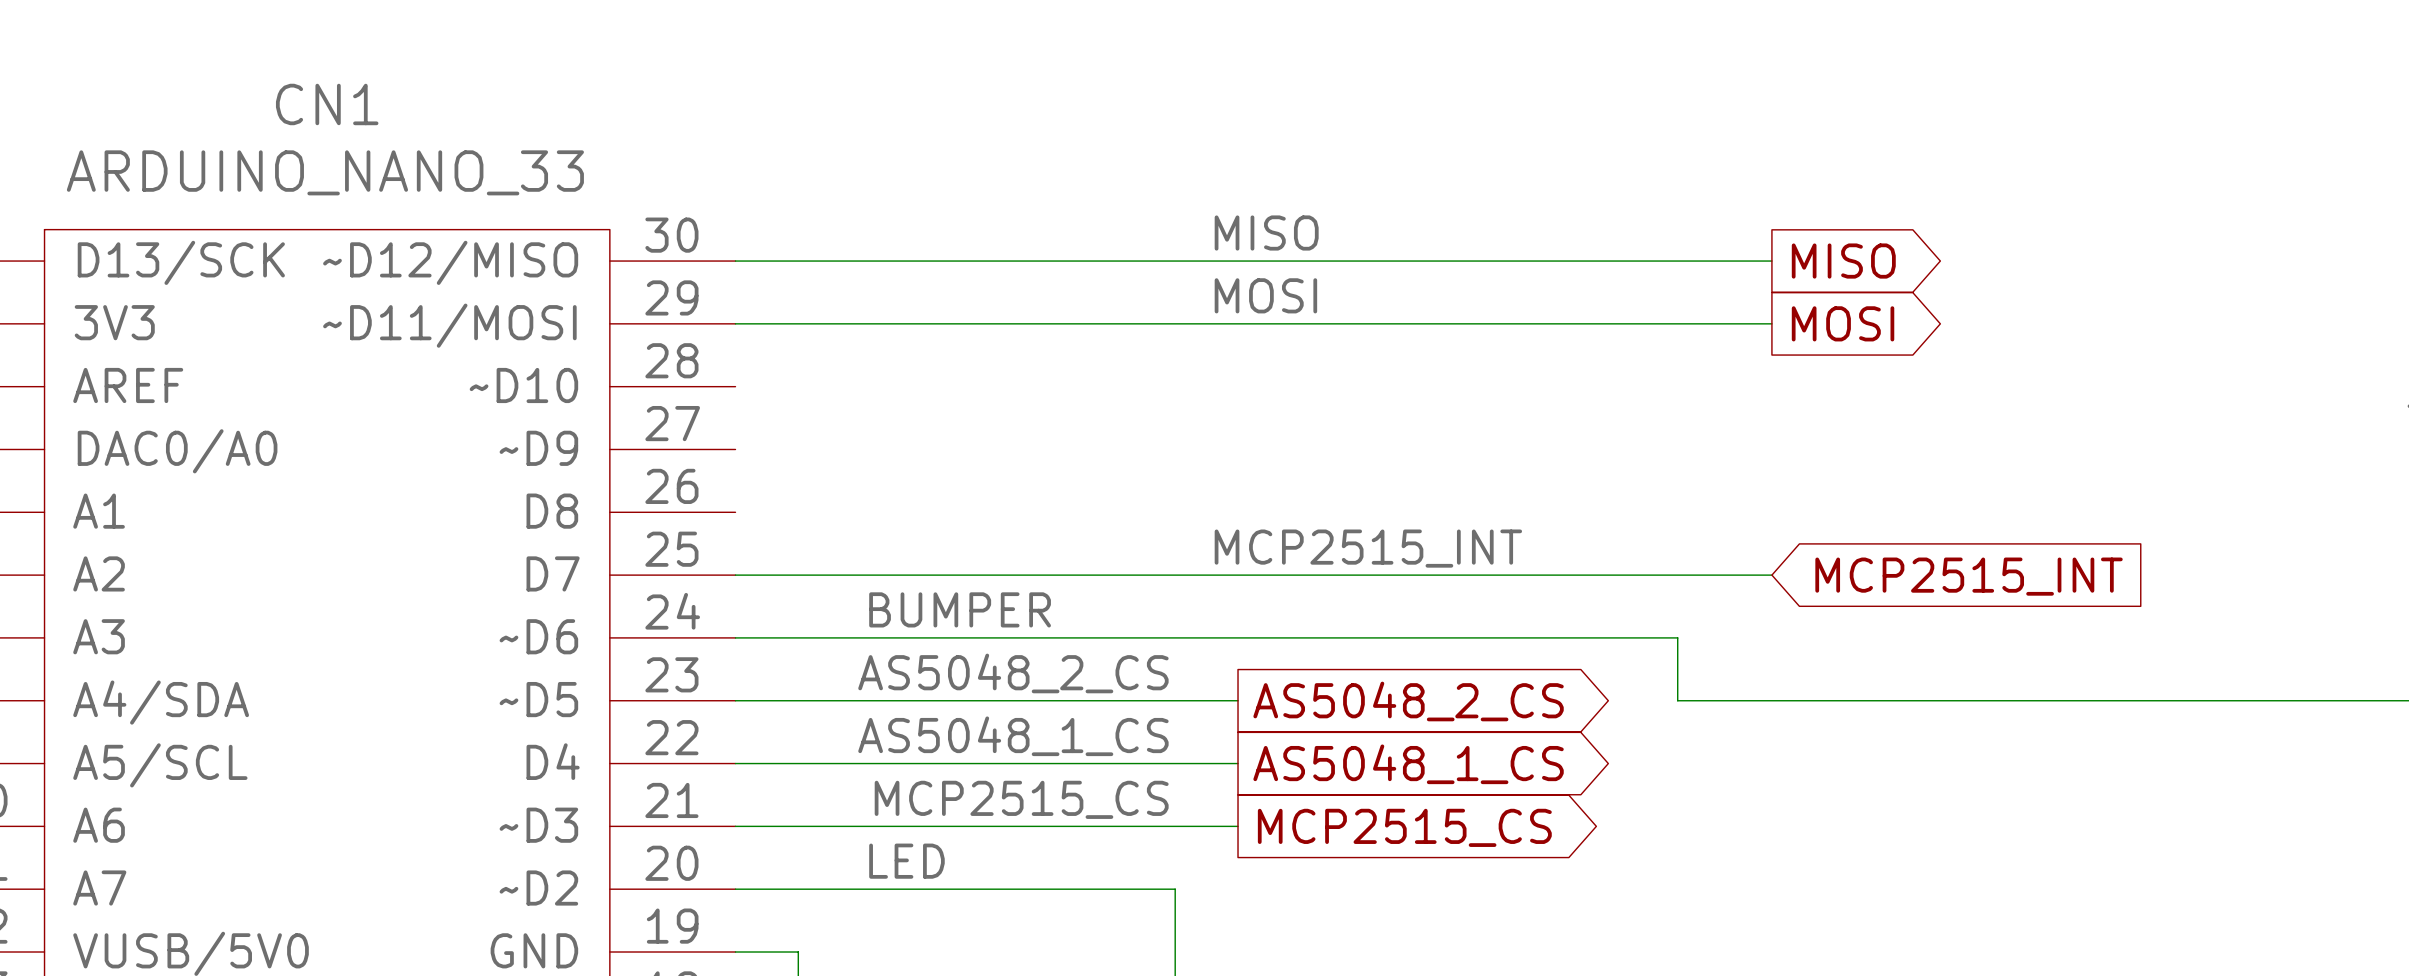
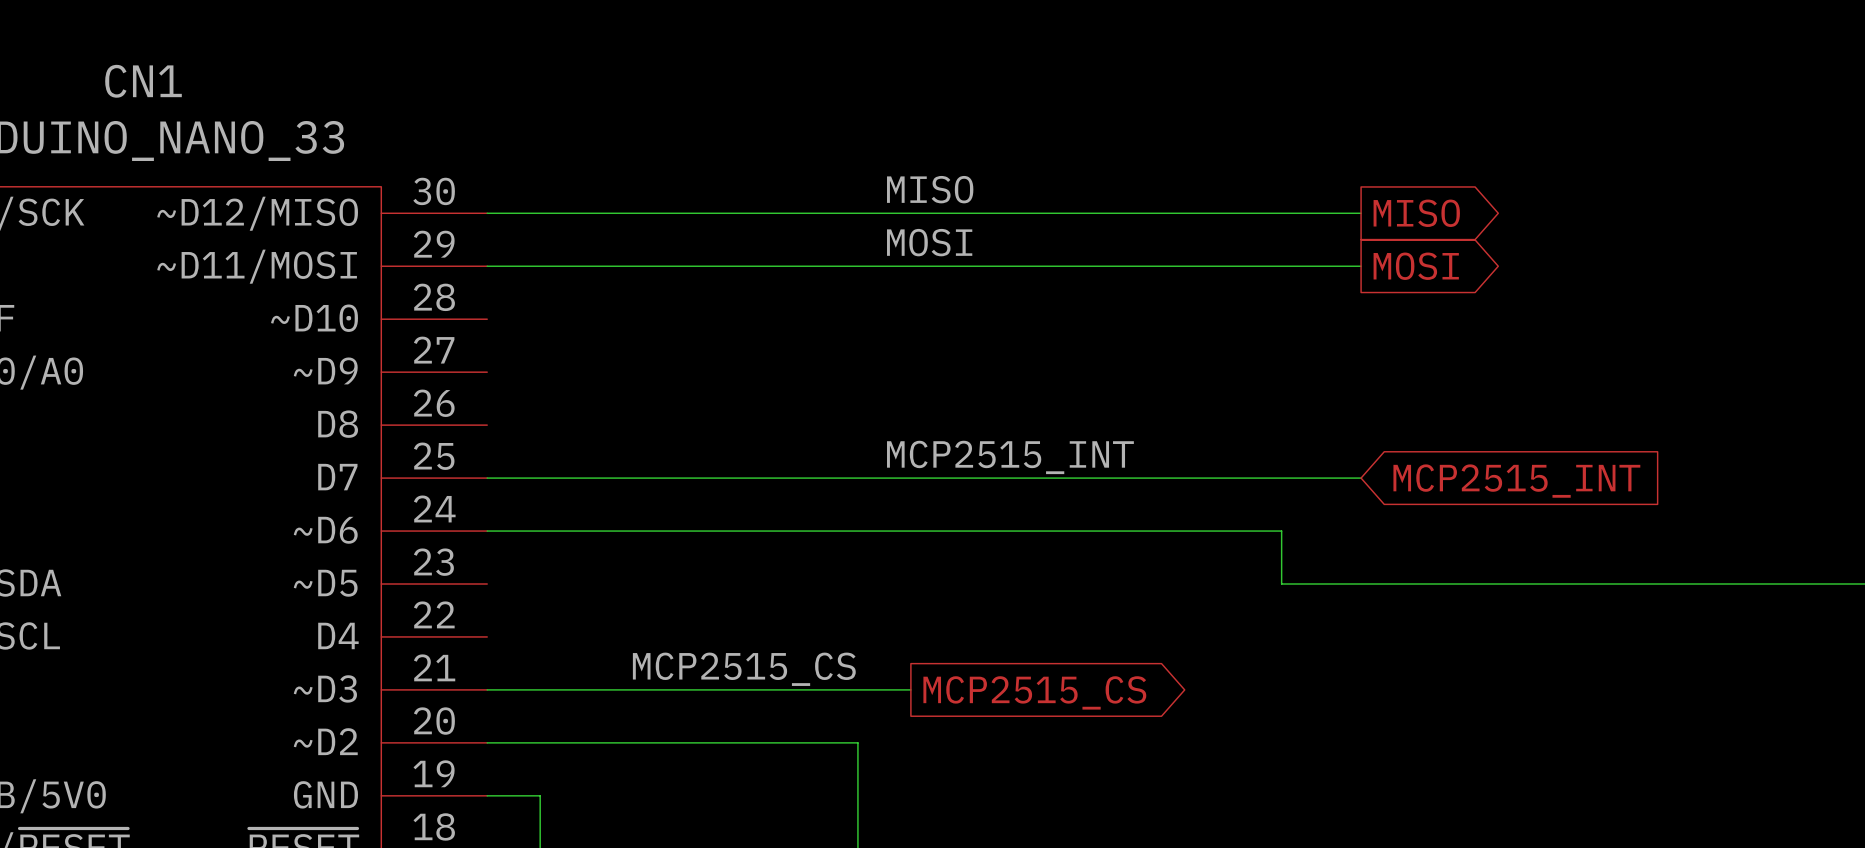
label: BUMPER (960, 609) -> none
label: AS5048_2_CS (1013, 673) -> none
wire: (735, 700) (1238, 700) -> none
global label: AS5048_2_CS (1408, 701) -> none
label: AS5048_1_CS (1013, 736) -> none
wire: (735, 763) (1238, 763) -> none
global label: AS5048_1_CS (1408, 764) -> none
label: LED (906, 861) -> none

